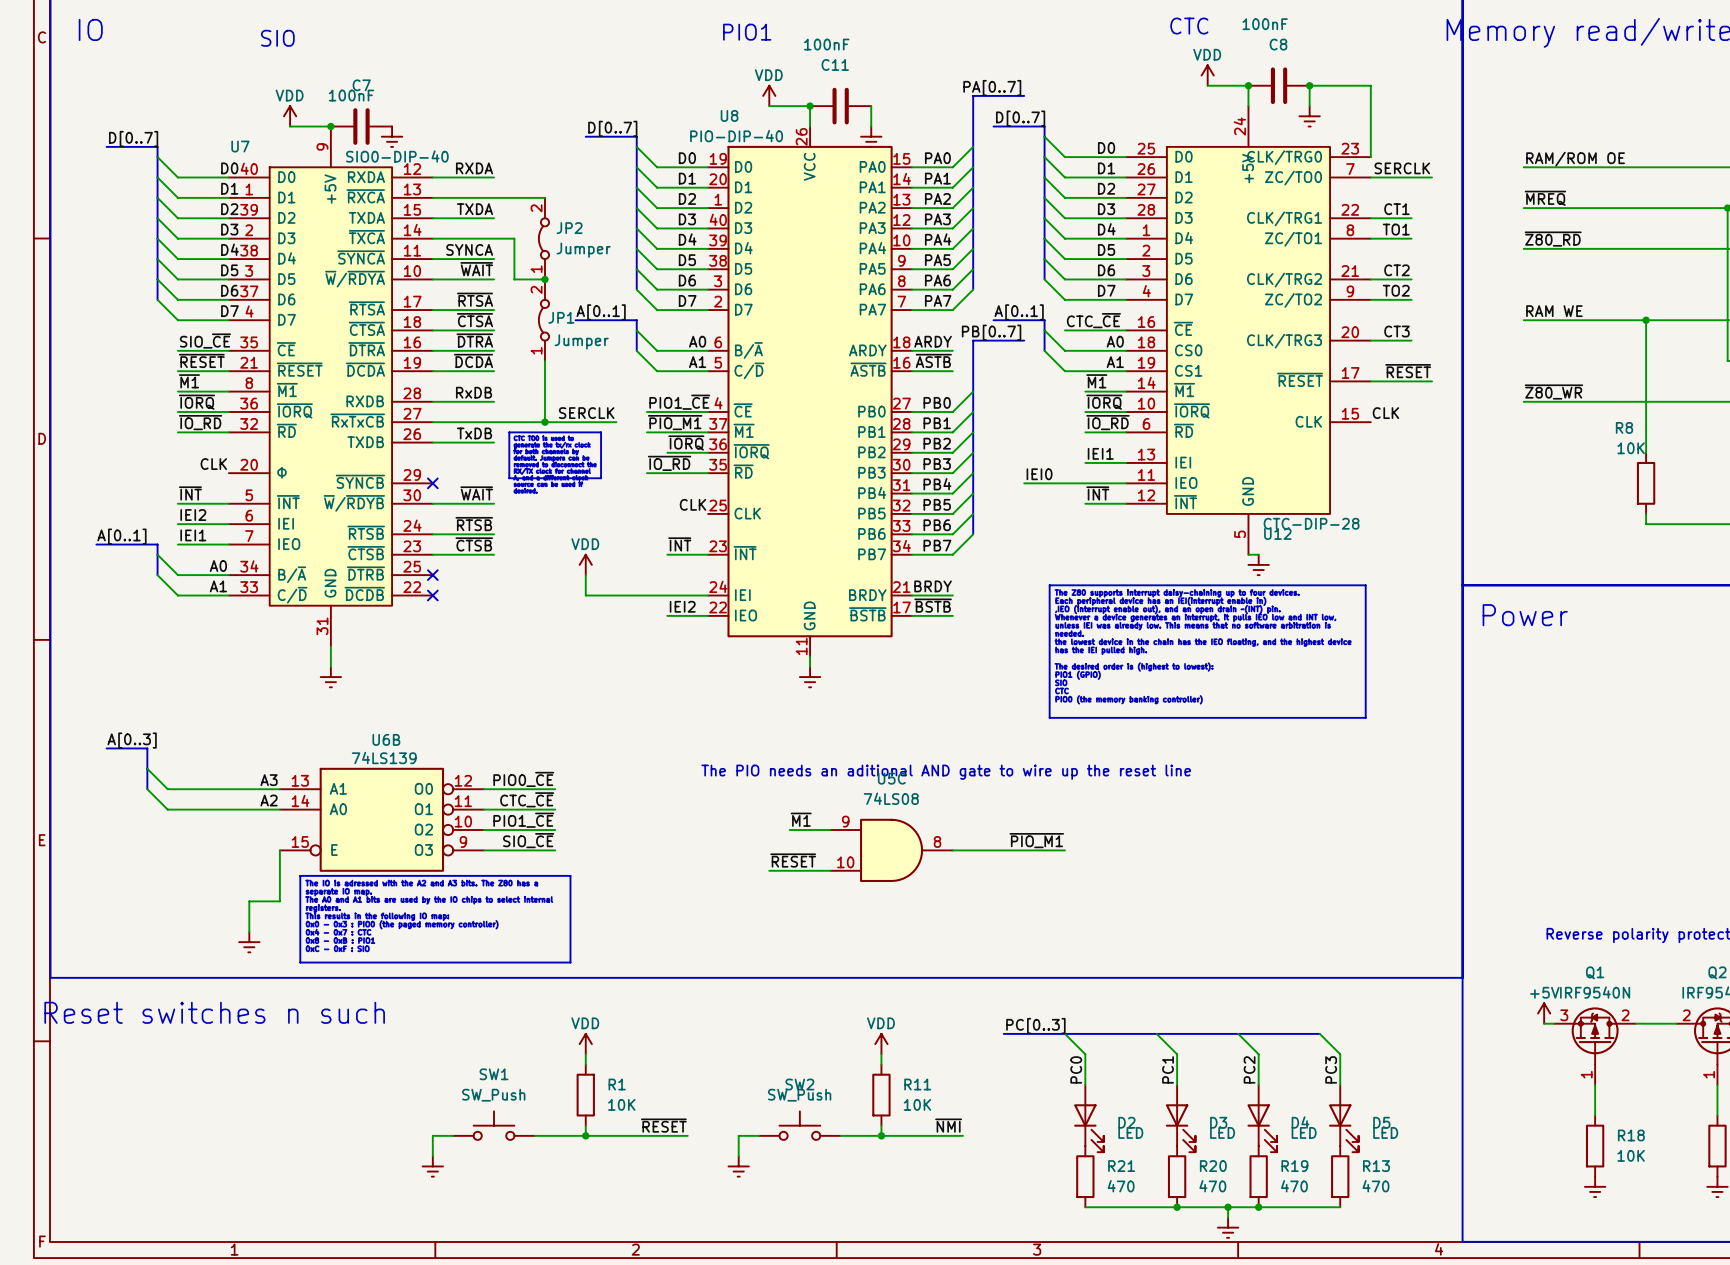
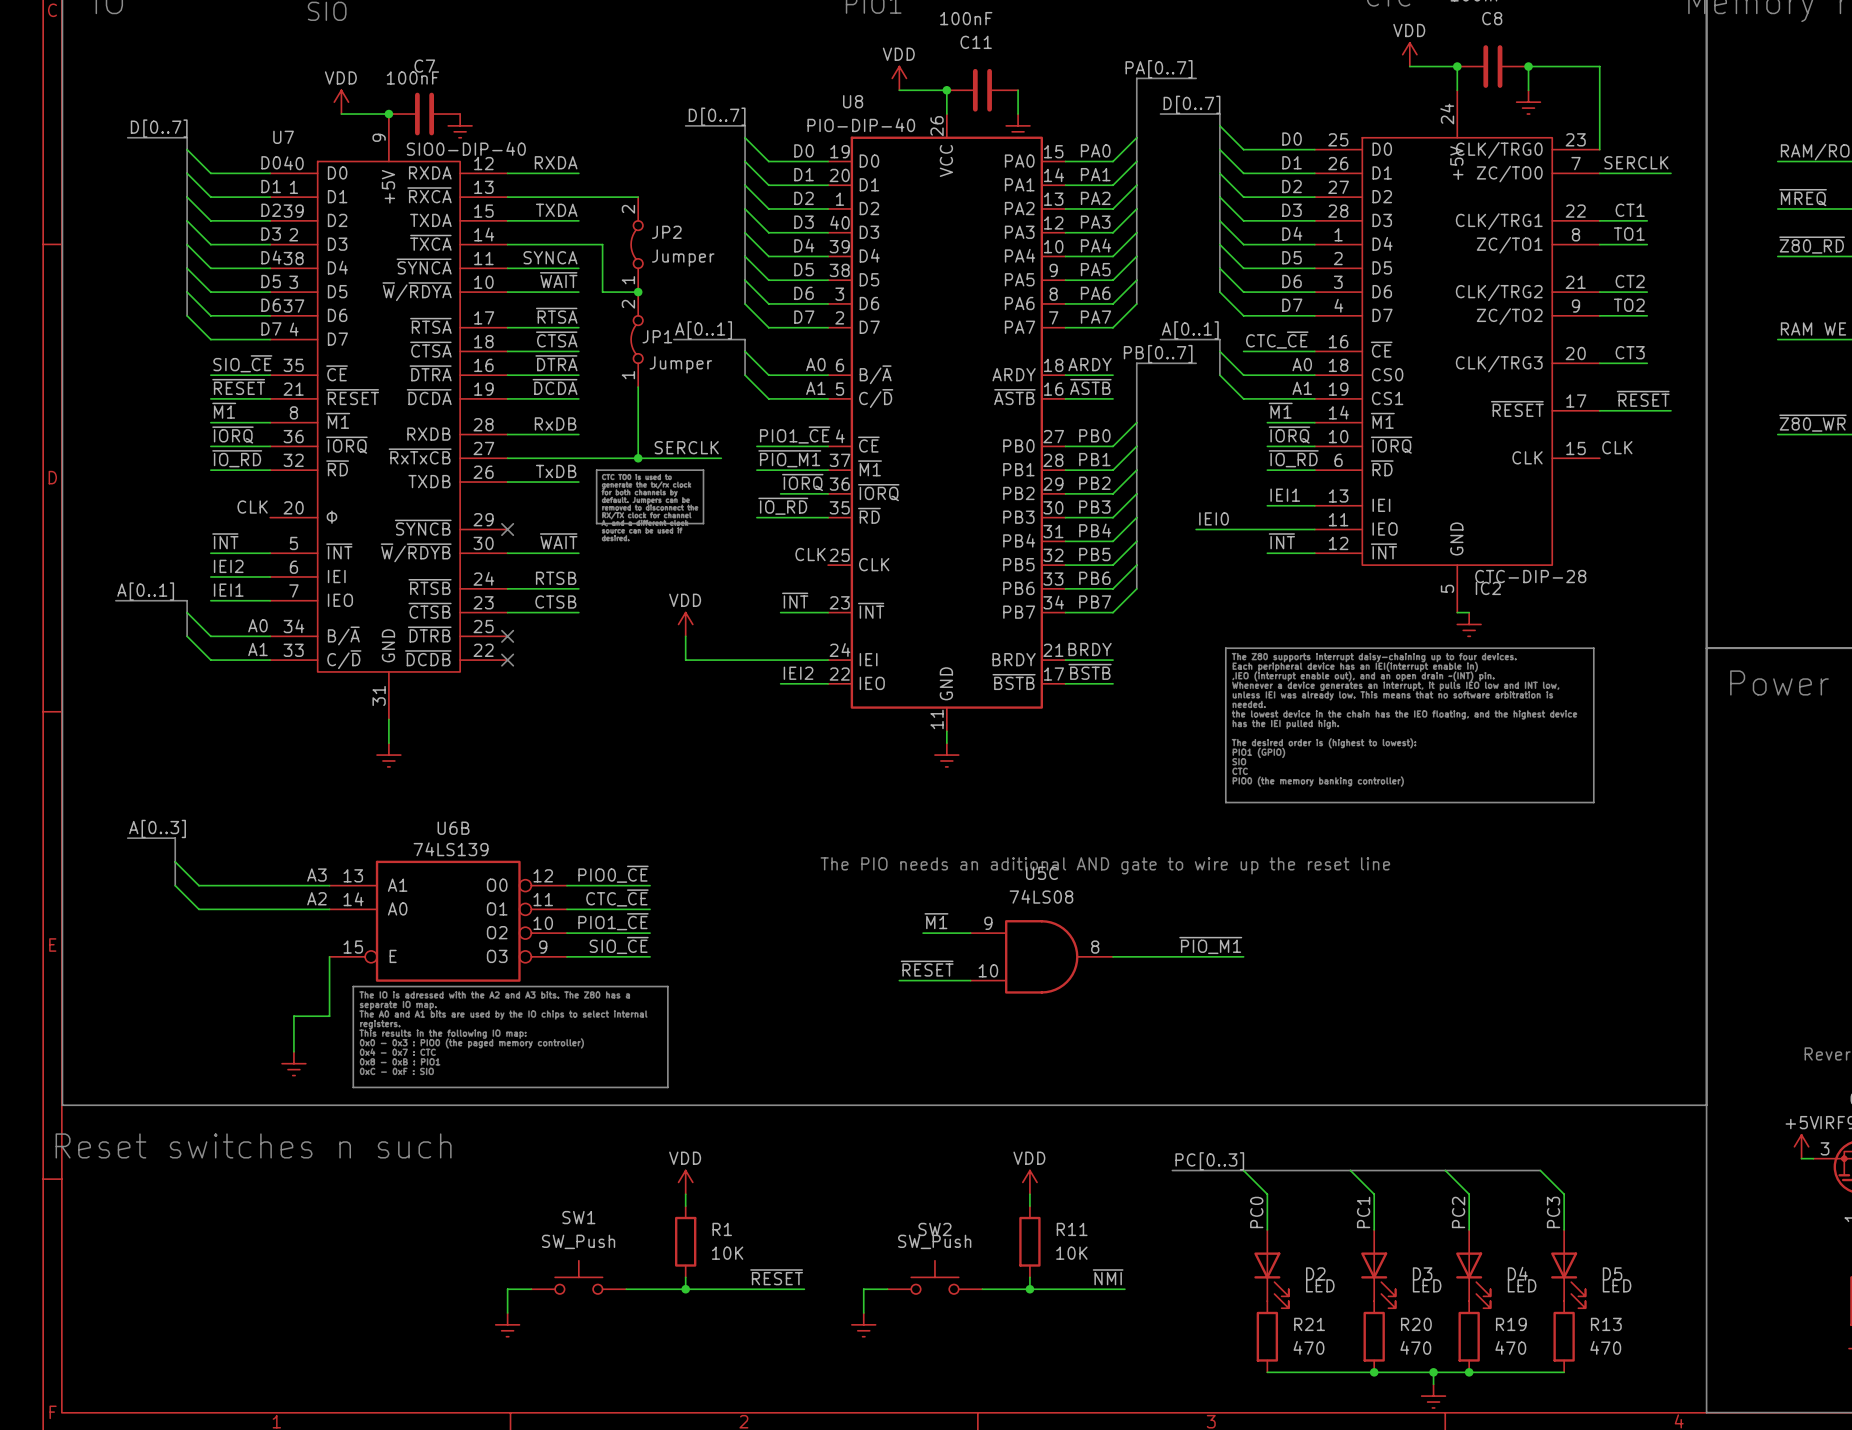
label: ~{RTSB} (474, 524) -> RTSB (556, 578)
U12 name: U12 (1277, 533) -> IC2 (1488, 588)
label: ~{CTSB} (474, 544) -> CTSB (555, 602)

